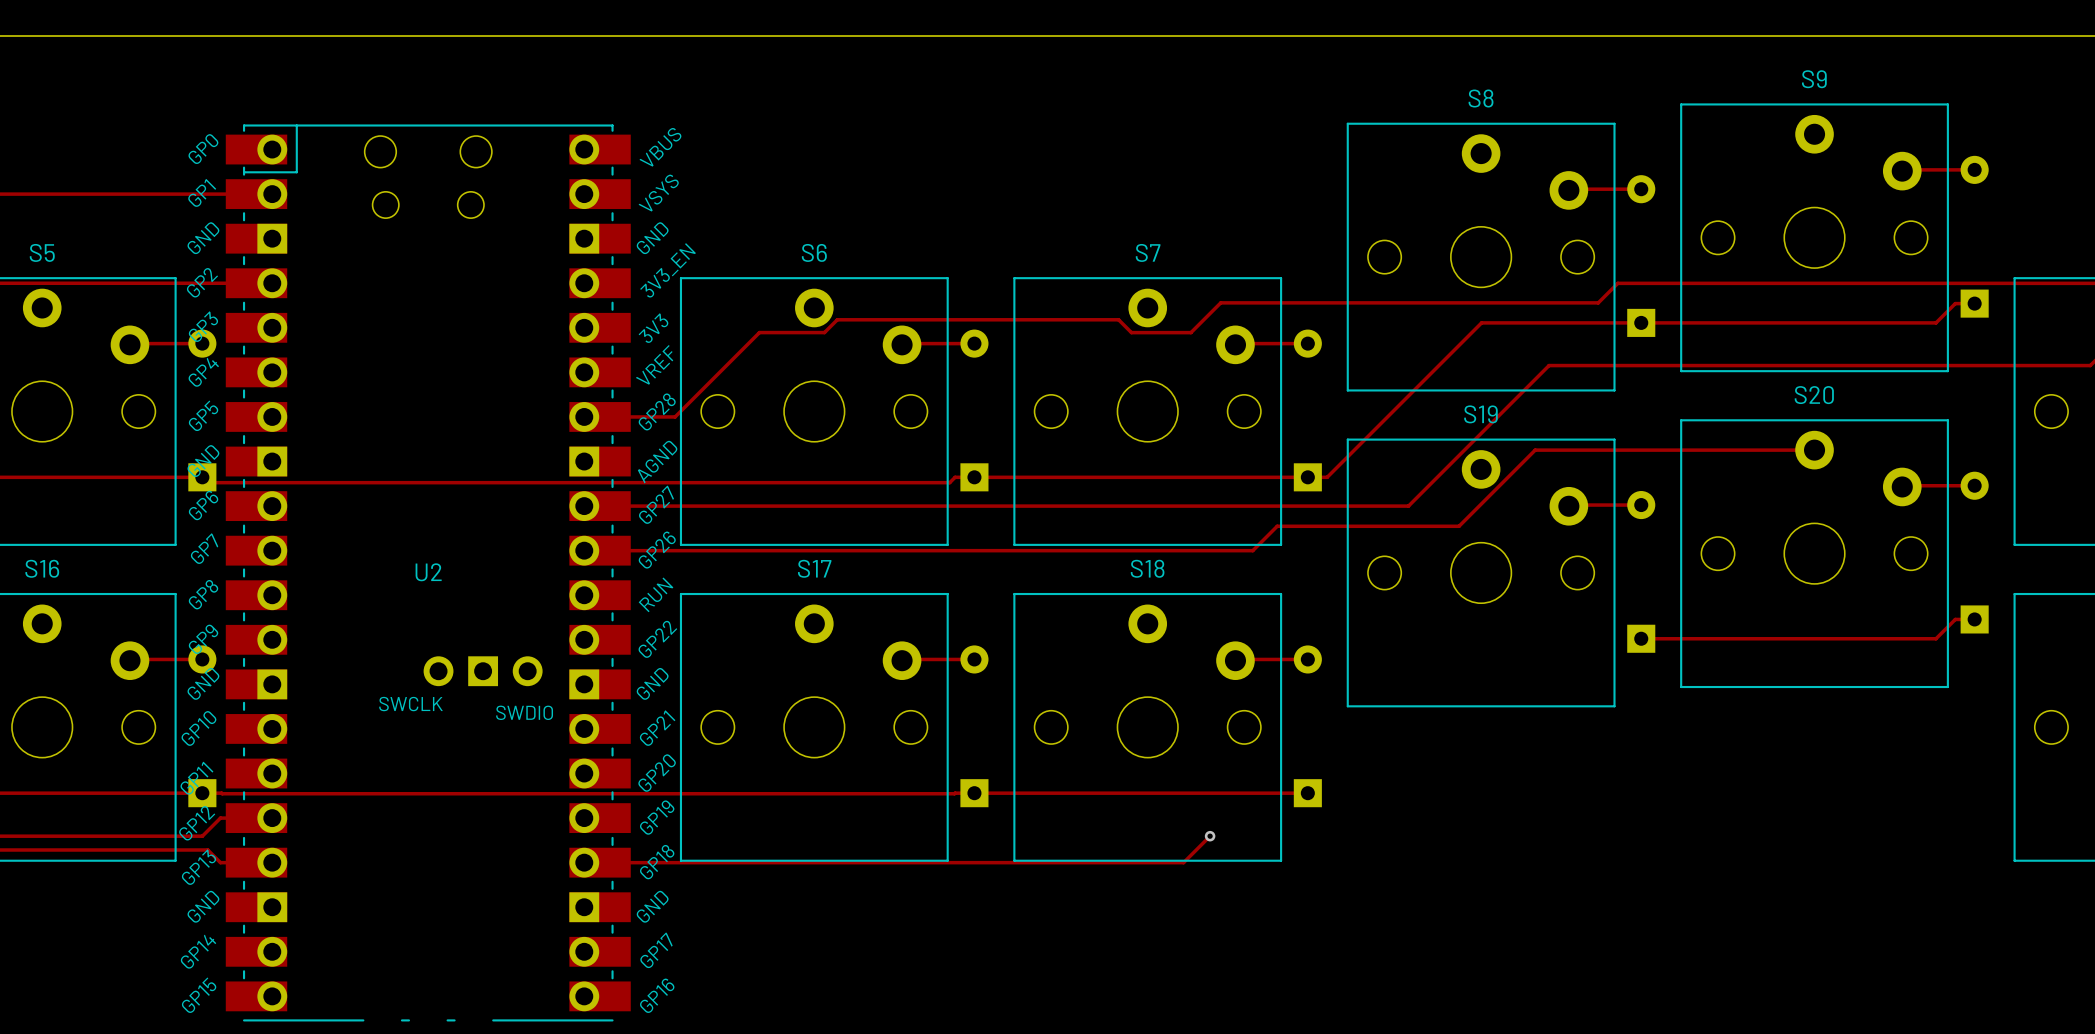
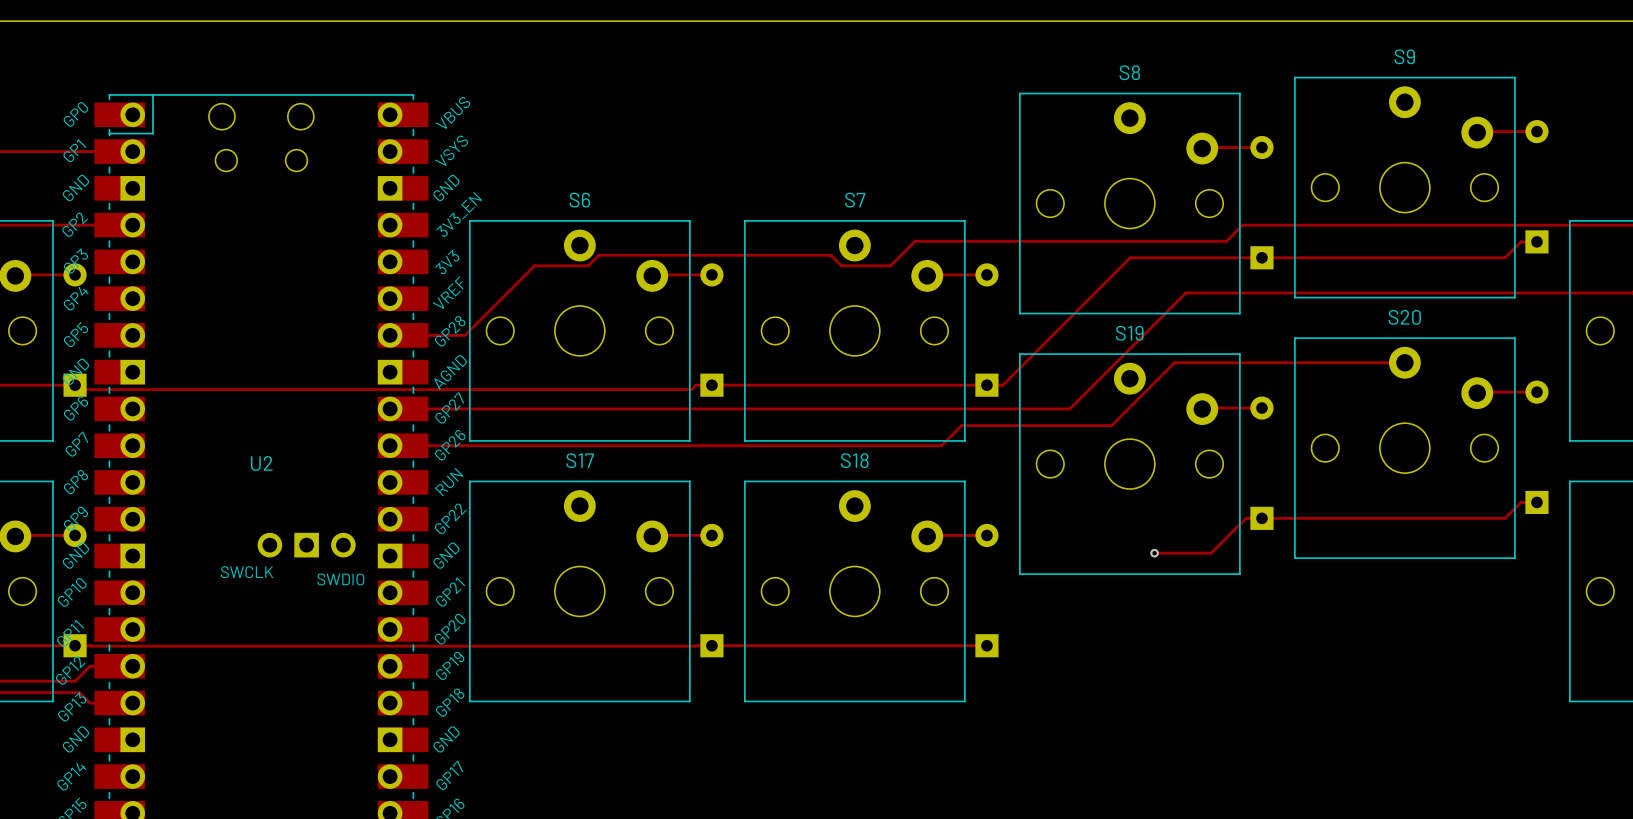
track: none -> (1261, 518) (1246, 518) (1211, 553) (1154, 553)
via: none -> (1154, 553)
track: (1210, 836) (1183, 862) (584, 862) -> none
via: (1210, 836) -> none

